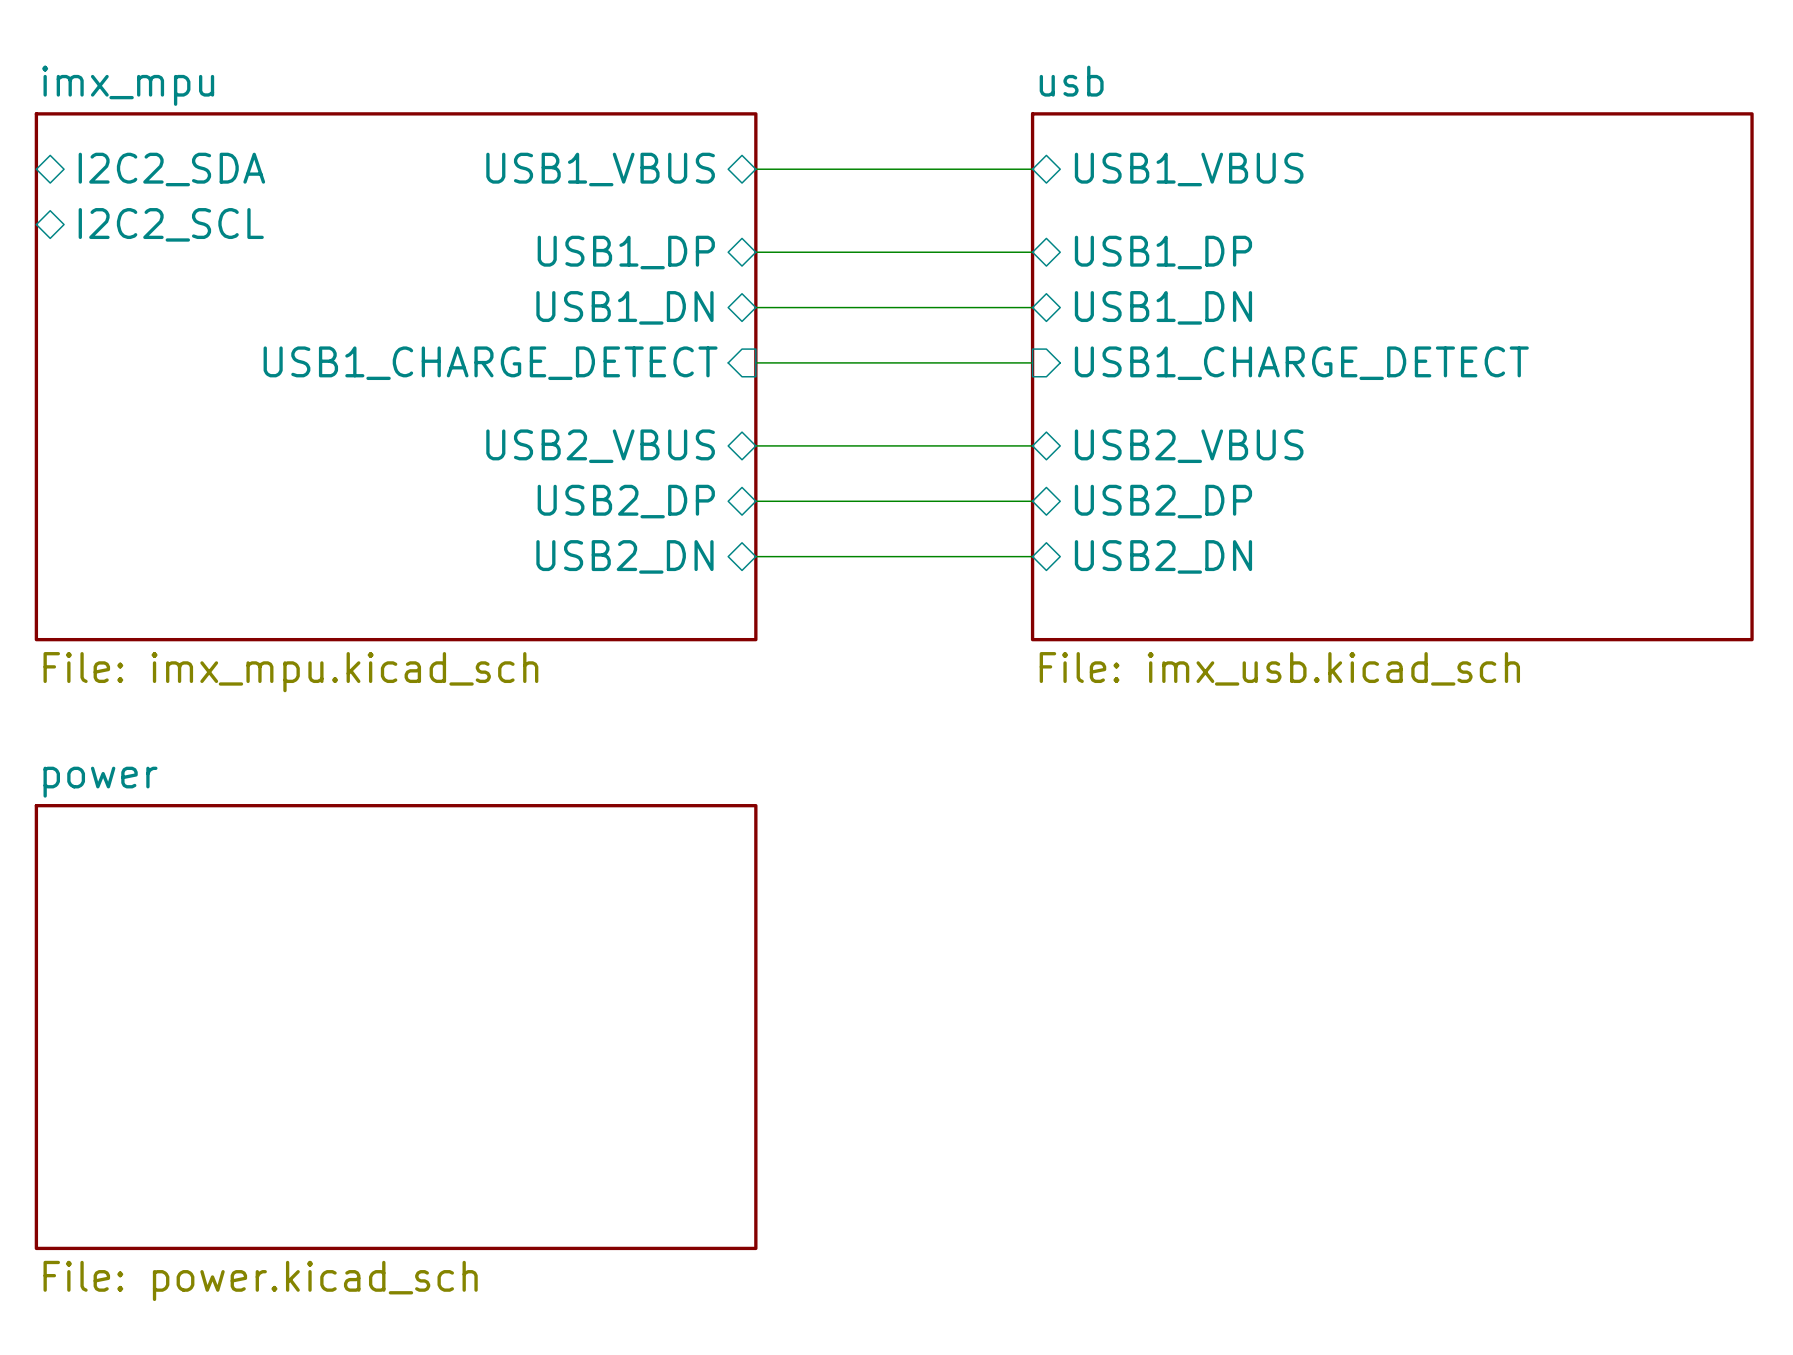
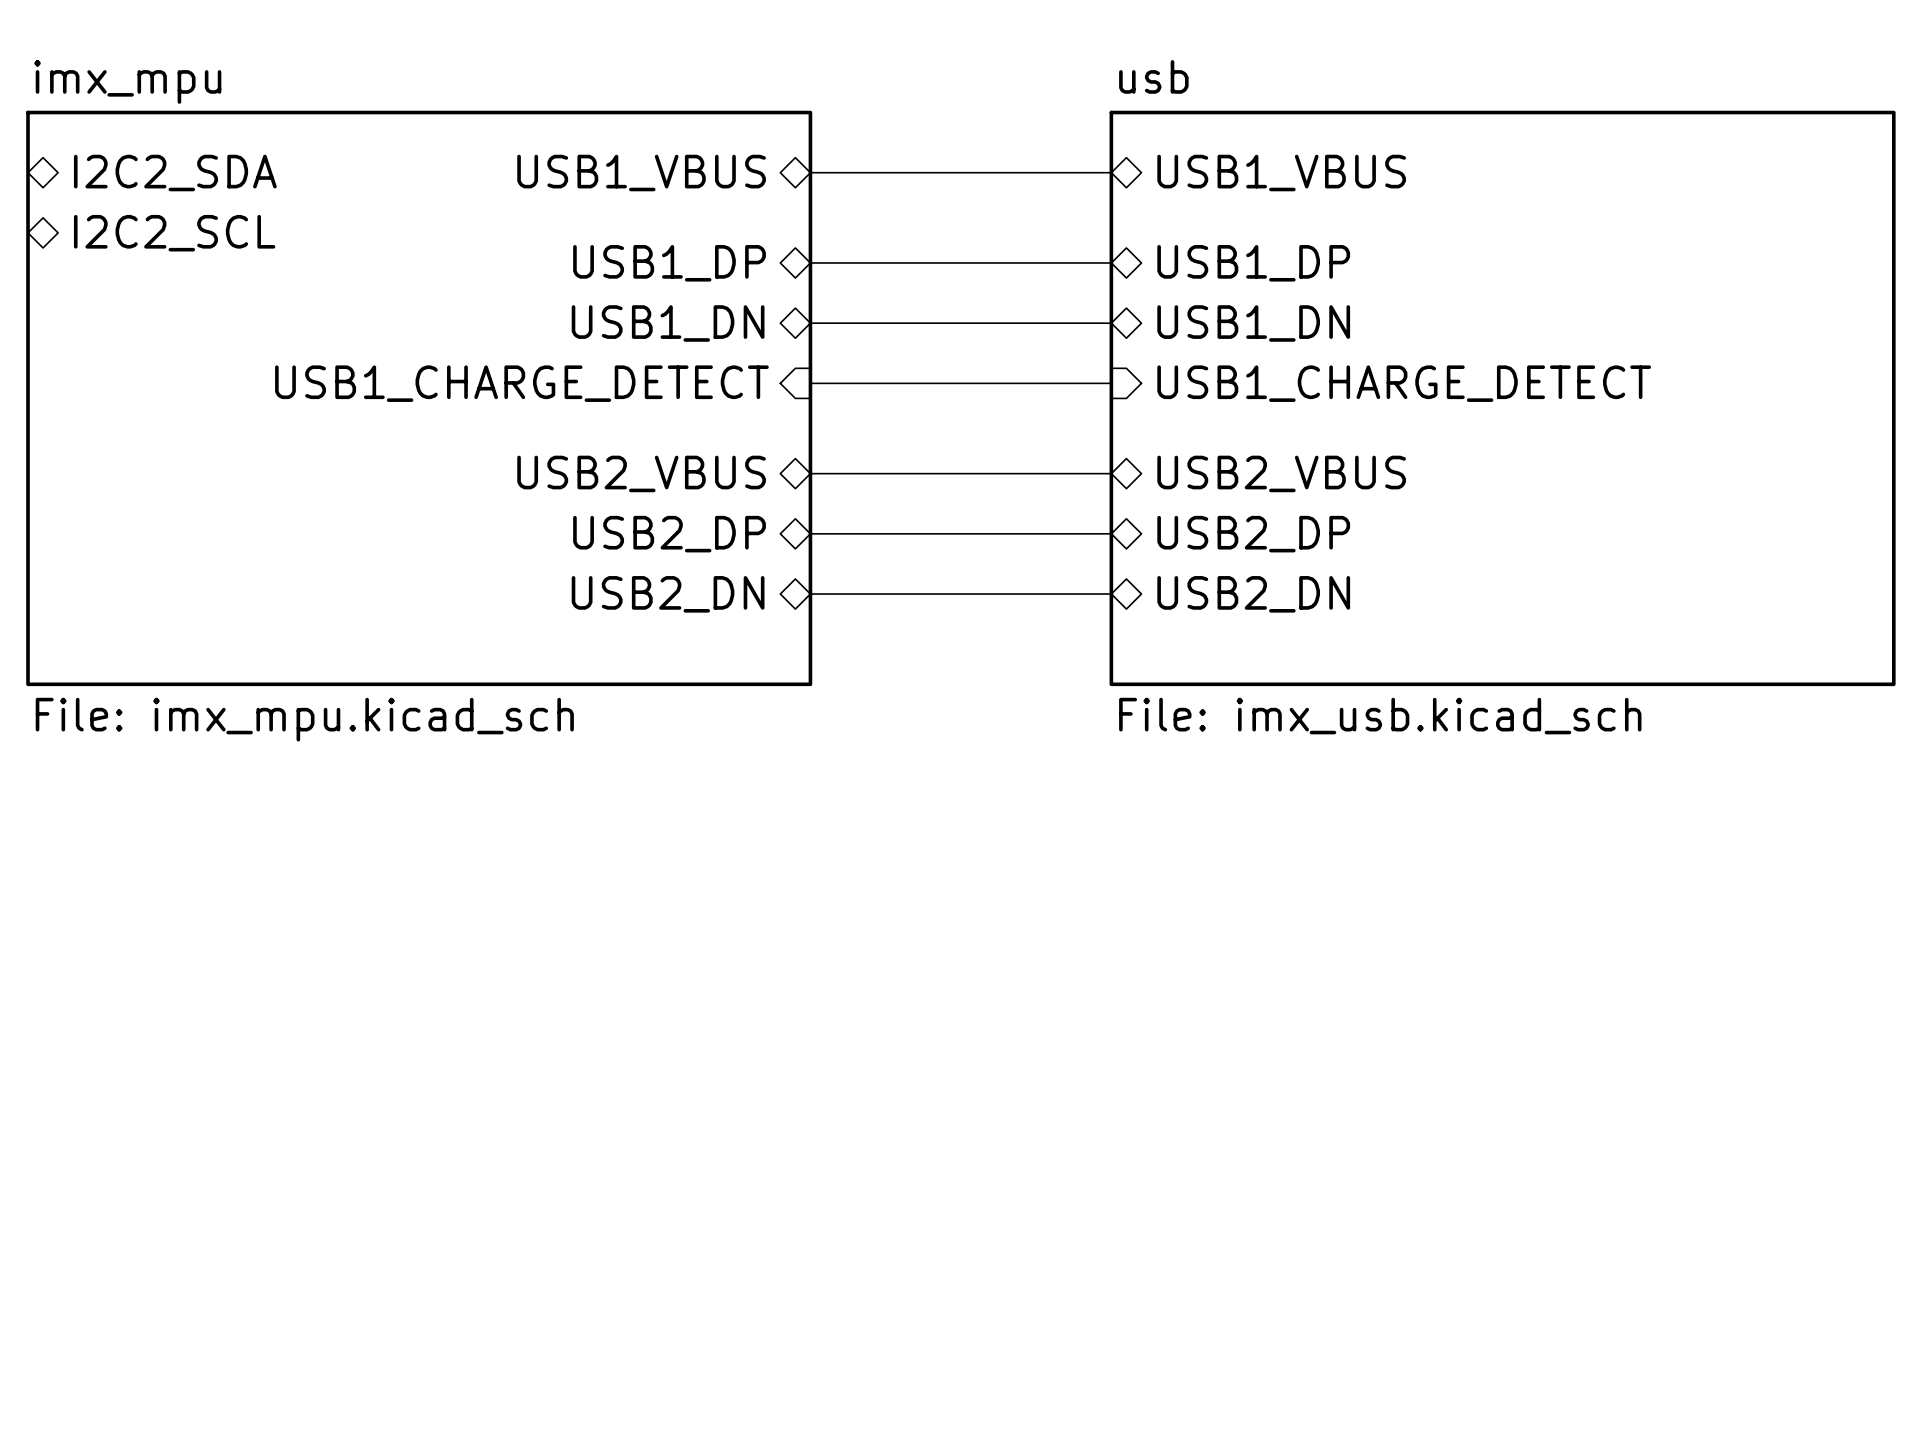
sheet power: File: power.kicad_sch (396, 1027) -> none

